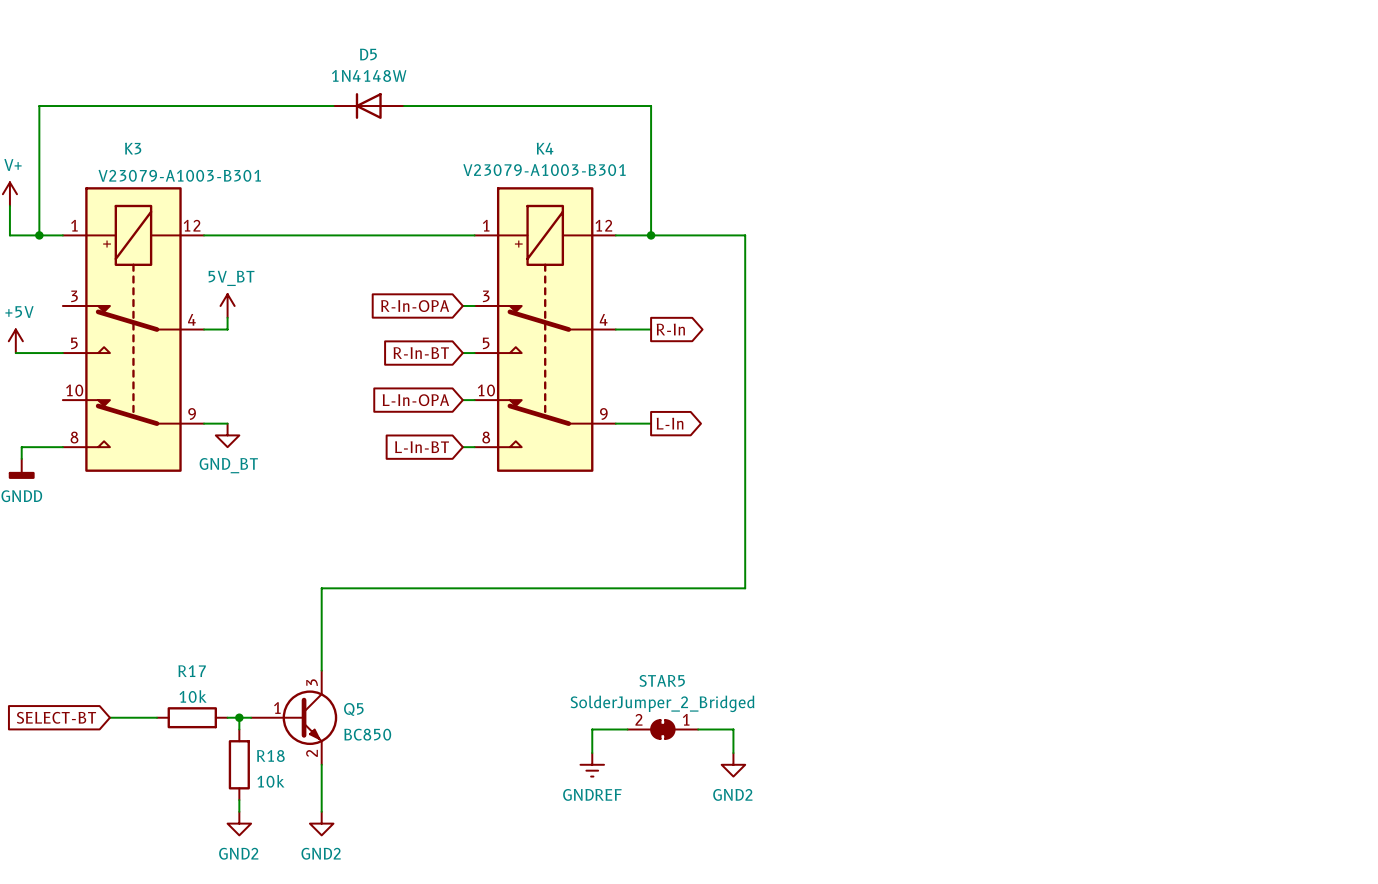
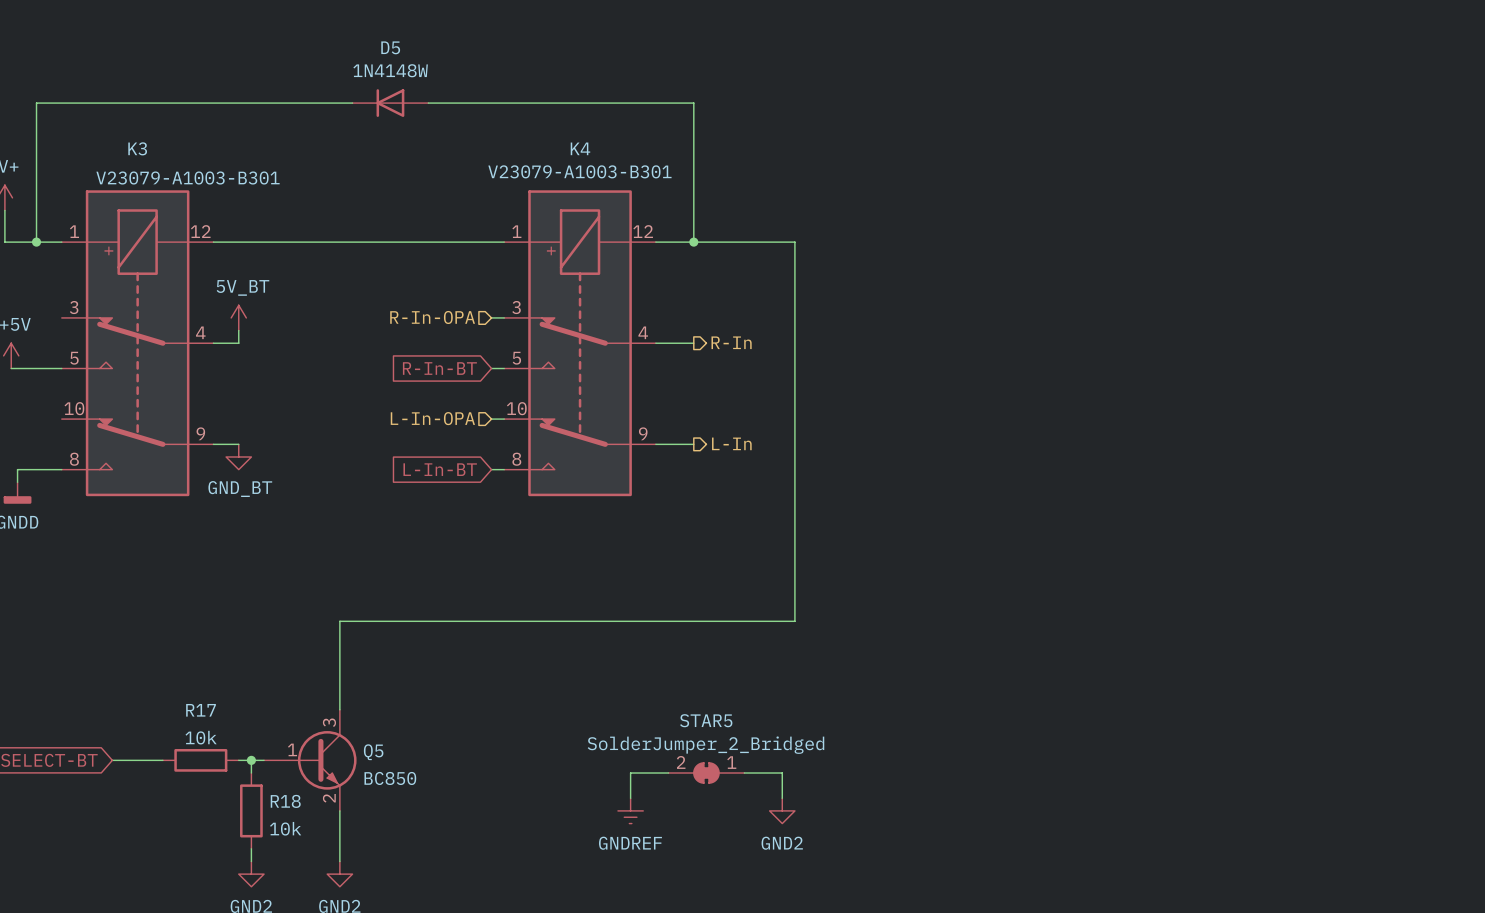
hierarchical label: none -> R-In-OPA (432, 317)
global label: R-In-OPA (415, 306) -> none
global label: R-In (670, 329) -> none
hierarchical label: none -> R-In (731, 342)
hierarchical label: none -> L-In-OPA (432, 418)
global label: L-In-OPA (415, 400) -> none
global label: L-In (670, 423) -> none
hierarchical label: none -> L-In (731, 443)

